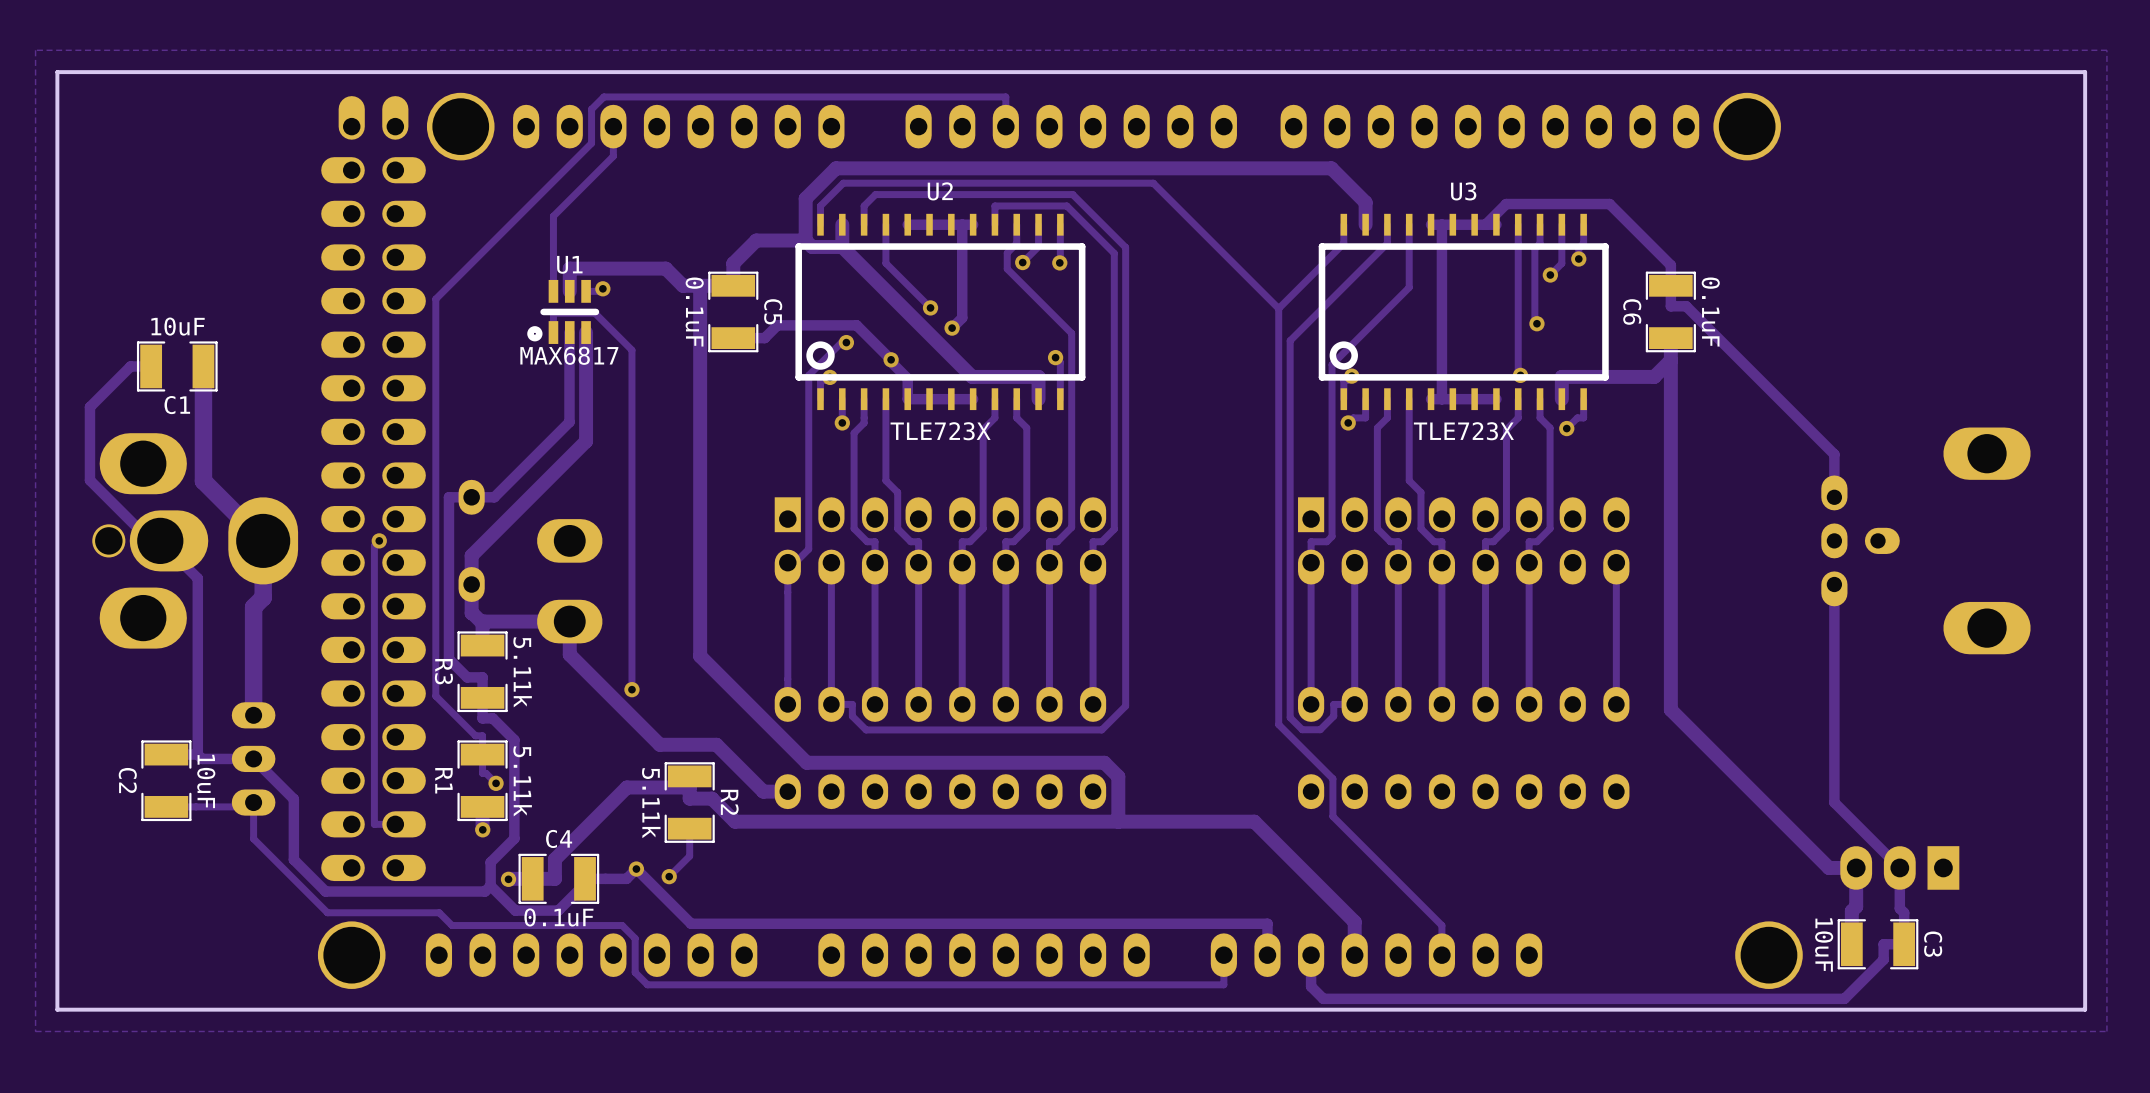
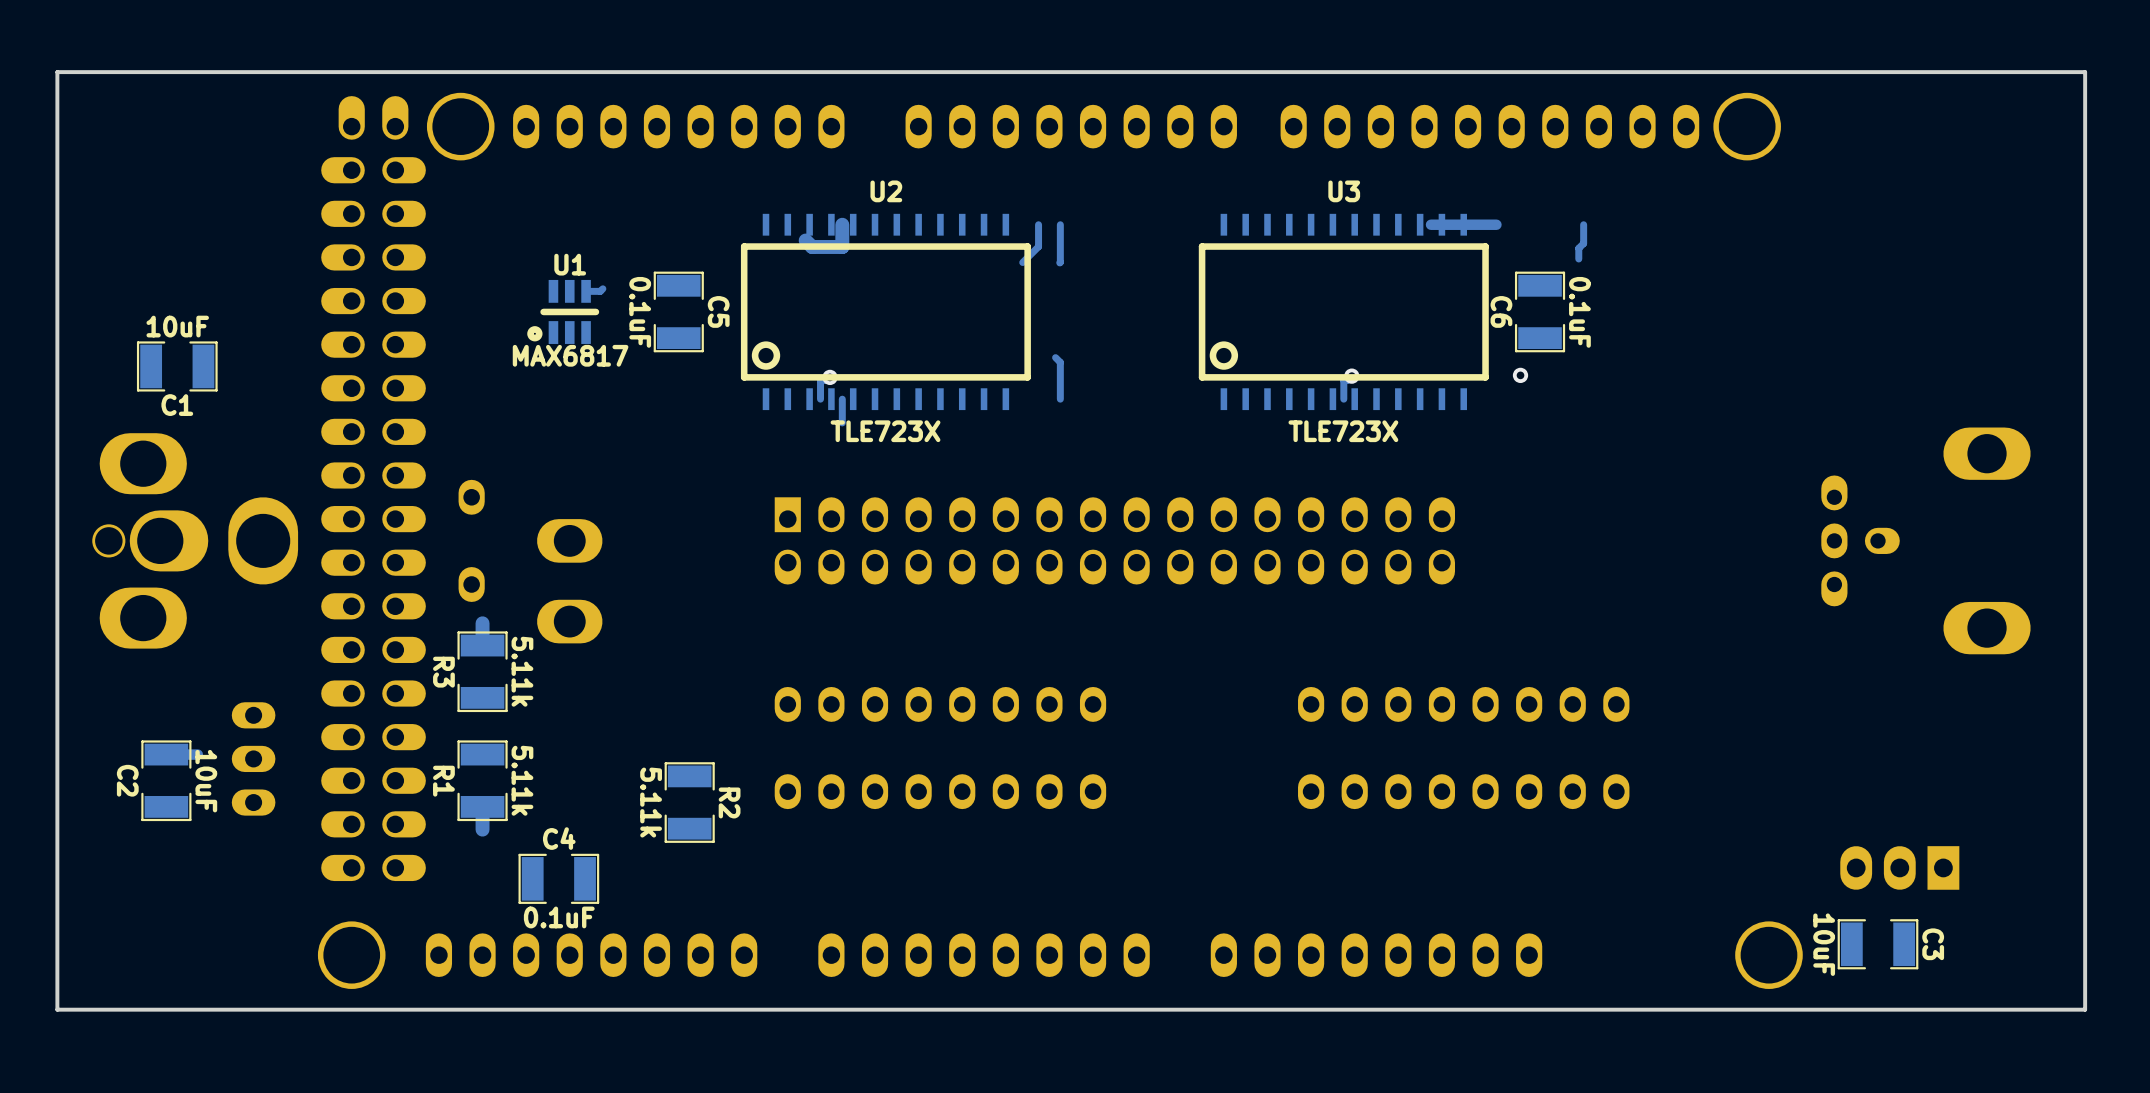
zone outline: (2106, 50) (2106, 1031) (35, 1031) (35, 50) (2106, 50) -> none
track: (613, 126) (613, 156) (553, 216) (553, 291) -> none
track: (1005, 126) (1005, 96) (603, 96) (591, 109) (591, 143) (435, 299) (435, 696) (475, 735) (482, 735) (482, 773) (486, 773) (496, 783) -> none
track: (820, 224) (820, 205) (843, 183) (1153, 183) (1278, 308) -> none
track: (864, 224) (864, 205) (875, 194) (1072, 194) (1125, 247) (1125, 706) (1101, 729) (866, 729) (852, 716) (852, 704) (831, 704) (831, 562) -> none
track: (885, 224) (885, 263) (930, 307) -> none
track: (962, 224) (962, 317) (952, 328) -> none
track: (973, 224) (907, 224) -> none
track: (994, 224) (994, 205) (1066, 205) (1114, 253) (1114, 529) (1101, 541) (1093, 541) (1093, 704) -> none
track: (1016, 224) (1016, 243) (1007, 253) (1007, 268) (1071, 333) (1071, 527) (1057, 541) (1049, 541) (1049, 704) -> none
track: (1343, 224) (1343, 243) (1278, 308) -> none
track: (1365, 224) (1365, 202) (1331, 168) (835, 168) (805, 198) (805, 240) (756, 240) (733, 263) (733, 285) (682, 285) (665, 268) (569, 268) (569, 291) -> none
track: (1387, 224) (1387, 243) (1290, 340) (1290, 717) (1302, 729) (1320, 729) (1333, 716) (1333, 704) (1354, 704) (1354, 562) -> none
track: (1409, 224) (1409, 287) (1332, 364) (1332, 536) (1326, 541) (1311, 541) (1311, 704) -> none
track: (1441, 224) (1441, 399) -> none
track: (1485, 224) (1506, 204) (1609, 204) (1670, 265) (1670, 306) (1686, 306) (1834, 454) (1834, 497) -> none
track: (1518, 224) (1518, 373) (1520, 375) -> none
track: (1540, 224) (1540, 243) (1534, 248) (1534, 321) (1536, 323) -> none
track: (1561, 224) (1561, 263) (1550, 275) -> none
track: (842, 246) (972, 376) (1038, 376) (1038, 399) -> none
via: (1578, 259) -> none
via: (1022, 262) -> none
via: (1059, 262) -> none
via: (1550, 275) -> none
track: (700, 285) (700, 656) (806, 762) (1104, 762) (1118, 776) (1118, 821) -> none
via: (602, 288) -> none
via: (930, 307) -> none
track: (1278, 308) (1278, 724) (1332, 778) (1332, 816) (1441, 925) (1441, 955) -> none
C5 position: (733, 311) -> (678, 311)
U2 position: (940, 311) -> (885, 311)
U3 position: (1463, 311) -> (1343, 311)
C6 position: (1670, 311) -> (1540, 311)
via: (1536, 323) -> none
via: (952, 328) -> none
track: (553, 332) (553, 313) (595, 313) (631, 350) (631, 689) -> none
track: (569, 332) (569, 422) (494, 497) (448, 497) (448, 659) (467, 677) (482, 677) (482, 718) (492, 718) (514, 739) (514, 838) (490, 862) (490, 885) -> none
track: (586, 332) (586, 441) (471, 555) (471, 613) (482, 623) (484, 621) (569, 621) (569, 654) (659, 744) (716, 744) (763, 791) (787, 791) -> none
track: (733, 338) (764, 338) (777, 325) (856, 325) (907, 378) (907, 399) (973, 399) -> none
track: (1670, 338) (1670, 709) (1828, 867) (1856, 867) (1856, 906) (1851, 911) (1851, 944) -> none
track: (846, 342) (841, 342) (808, 375) (808, 549) (787, 570) -> none
via: (846, 342) -> none
via: (1055, 357) -> none
via: (891, 359) -> none
track: (1670, 360) (1654, 376) (1561, 376) (1561, 399) -> none
track: (151, 366) (130, 366) (89, 407) (89, 480) (150, 540) (160, 540) (197, 578) (197, 754) (202, 758) (253, 758) (293, 799) (293, 859) (325, 891) (485, 891) (490, 885) -> none
track: (203, 366) (203, 481) (263, 540) (263, 597) (253, 607) (253, 715) -> none
track: (864, 399) (864, 423) (854, 433) (854, 528) (867, 541) (875, 541) (875, 704) -> none
track: (885, 399) (885, 480) (897, 492) (897, 528) (910, 541) (918, 541) (918, 704) -> none
track: (994, 399) (994, 417) (983, 429) (983, 528) (970, 541) (962, 541) (962, 704) -> none
track: (1016, 399) (1016, 417) (1026, 427) (1026, 528) (1013, 541) (1005, 541) (1005, 704) -> none
track: (1365, 399) (1365, 417) (1353, 417) (1348, 422) -> none
track: (1387, 399) (1387, 417) (1377, 427) (1377, 528) (1390, 541) (1398, 541) (1398, 704) -> none
track: (1409, 399) (1409, 480) (1420, 492) (1420, 528) (1434, 541) (1441, 541) (1441, 704) -> none
track: (1496, 399) (1431, 399) -> none
track: (1518, 399) (1518, 417) (1506, 429) (1506, 528) (1493, 541) (1485, 541) (1485, 704) -> none
track: (1540, 399) (1540, 417) (1550, 427) (1550, 528) (1536, 541) (1529, 541) (1529, 704) -> none
track: (1583, 399) (1583, 417) (1577, 417) (1566, 428) -> none
via: (842, 422) -> none
via: (1348, 422) -> none
via: (1566, 428) -> none
track: (379, 540) (374, 545) (374, 824) (395, 824) -> none
via: (379, 540) -> none
part: (940, 540) -> none
part: none -> (1114, 540)
part: (1463, 540) -> none
track: (787, 562) (787, 704) -> none
track: (1616, 562) (1616, 704) -> none
track: (1834, 584) (1834, 802) (1899, 867) (1899, 908) (1904, 912) (1904, 944) (1883, 944) (1883, 959) (1844, 998) (1323, 998) (1311, 986) (1311, 955) -> none
via: (631, 689) -> none
track: (689, 776) (689, 798) (711, 798) (734, 821) (1254, 821) (1354, 922) (1354, 955) -> none
via: (496, 783) -> none
track: (689, 787) (626, 787) (554, 859) (554, 878) (508, 879) -> none
track: (253, 802) (253, 838) (327, 912) (439, 912) (452, 925) (622, 925) (635, 938) (635, 972) (647, 984) (1223, 984) (1223, 955) -> none
track: (253, 806) (166, 806) -> none
track: (689, 828) (689, 856) (669, 876) -> none
via: (482, 829) -> none
via: (636, 869) -> none
via: (669, 876) -> none
track: (585, 878) (626, 878) (636, 869) (691, 923) (1267, 923) (1267, 955) -> none
track: (590, 878) (558, 910) (515, 910) (490, 885) -> none
via: (508, 879) -> none

